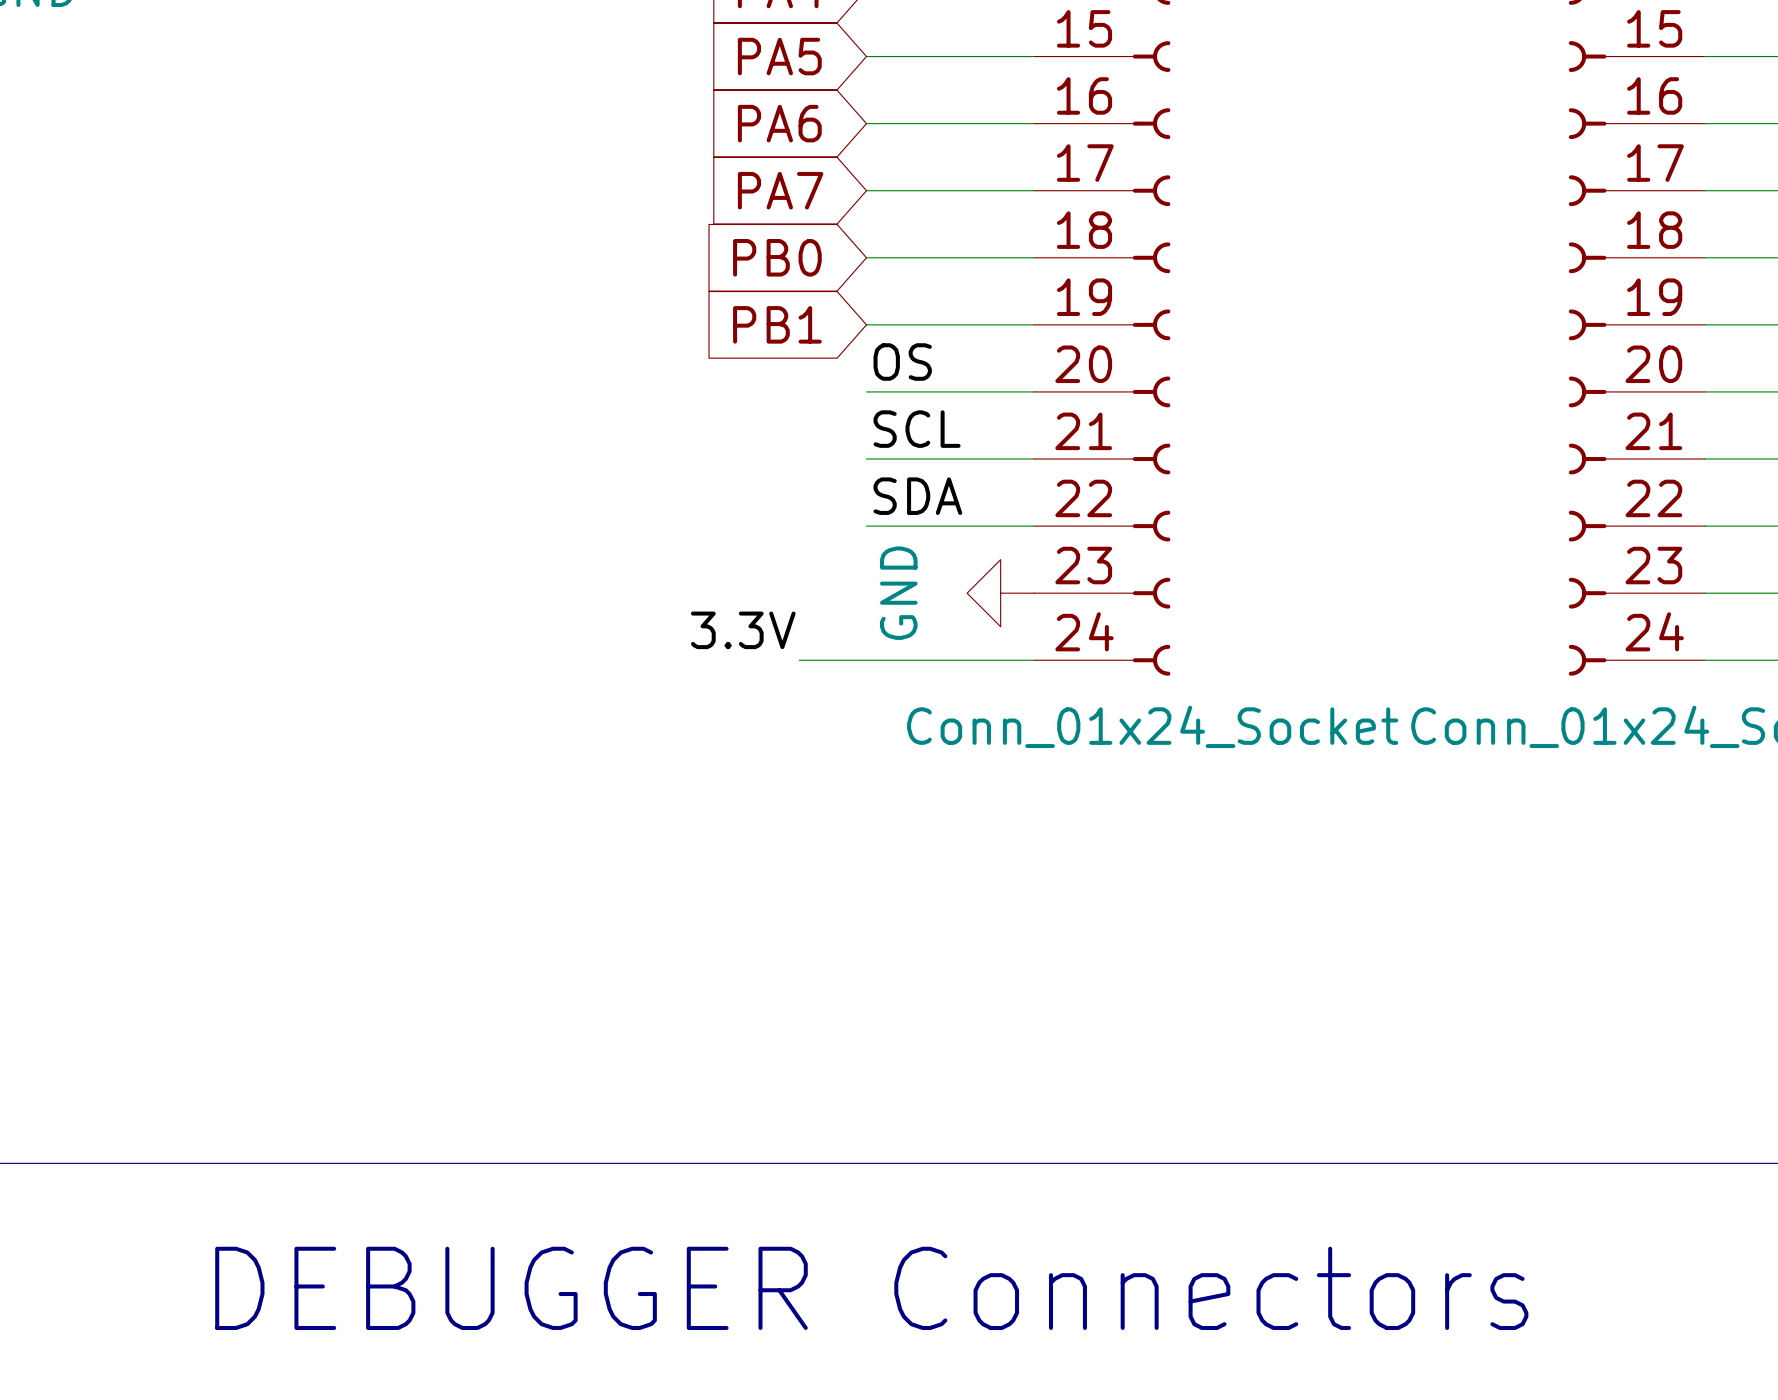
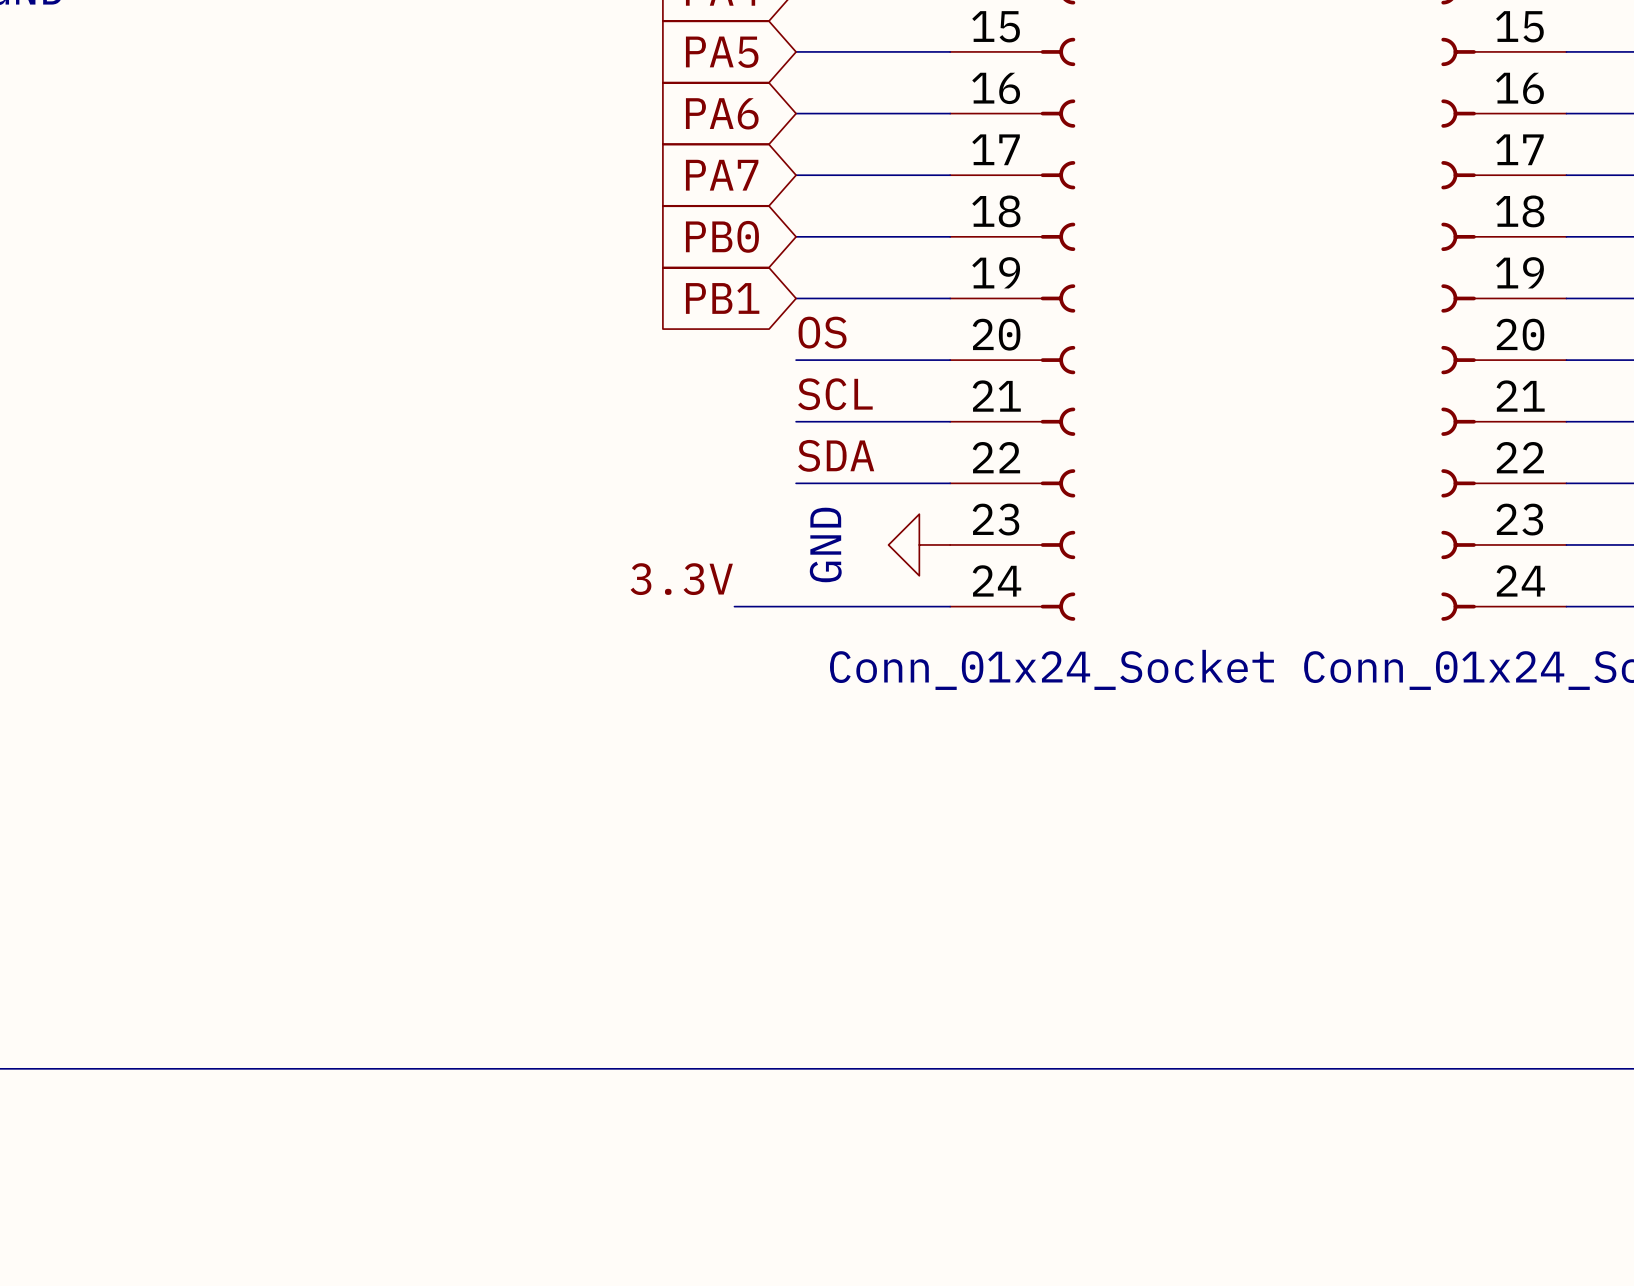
text: DEBUGGER Connectors (871, 1288) -> none

